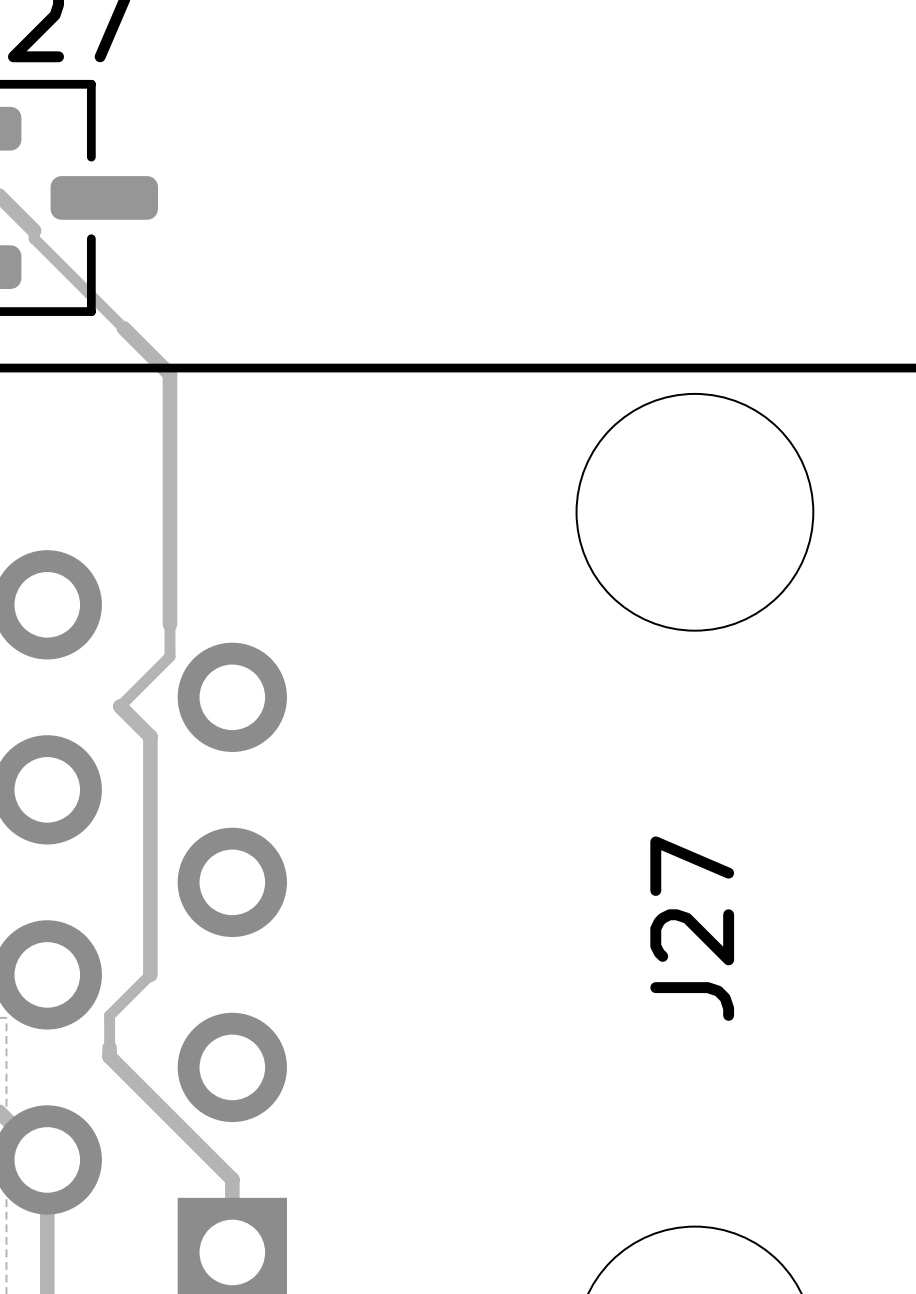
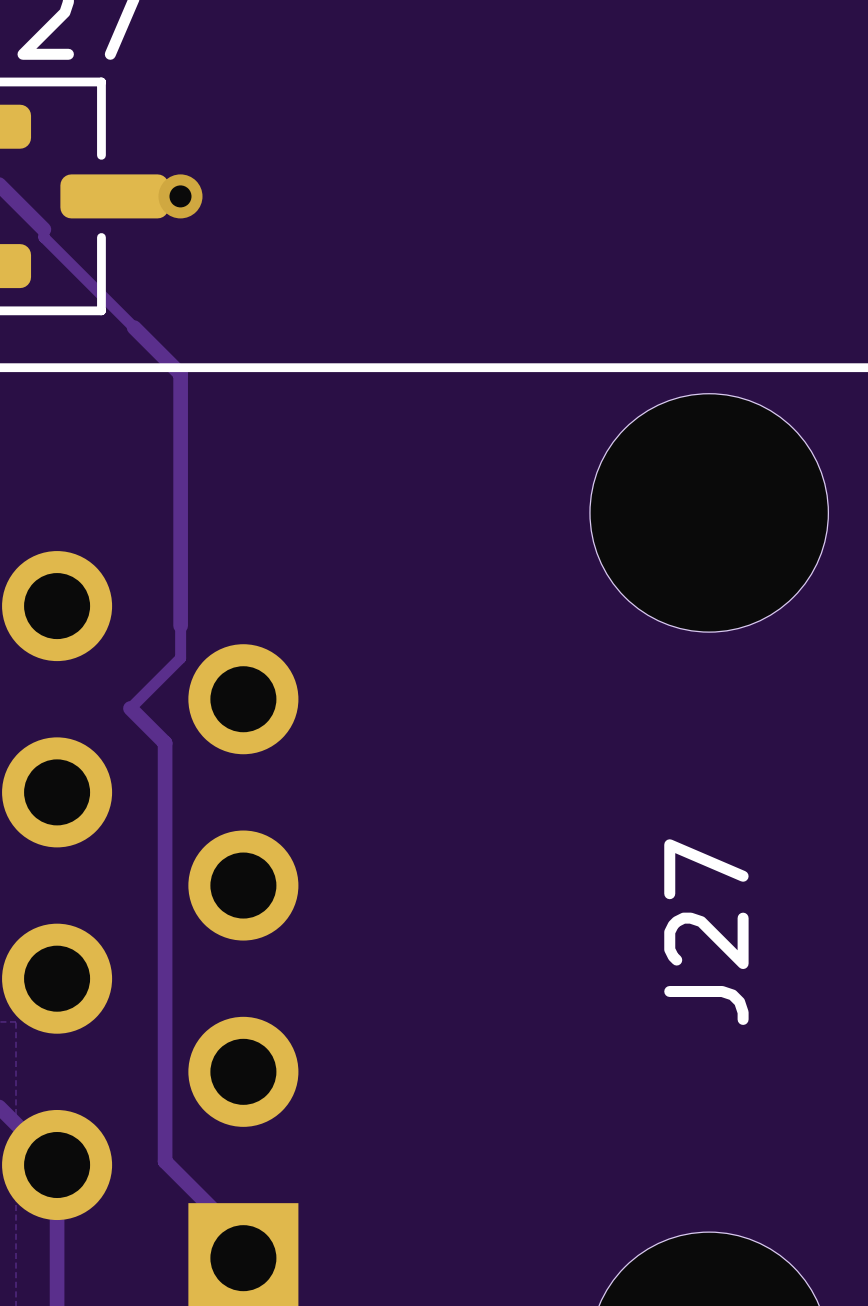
via: none -> (180, 196)
track: (150, 736) (150, 974) (109, 1015) (109, 1056) (232, 1179) (232, 1234) -> (160, 738) (165, 743) (165, 1161) (243, 1239)

